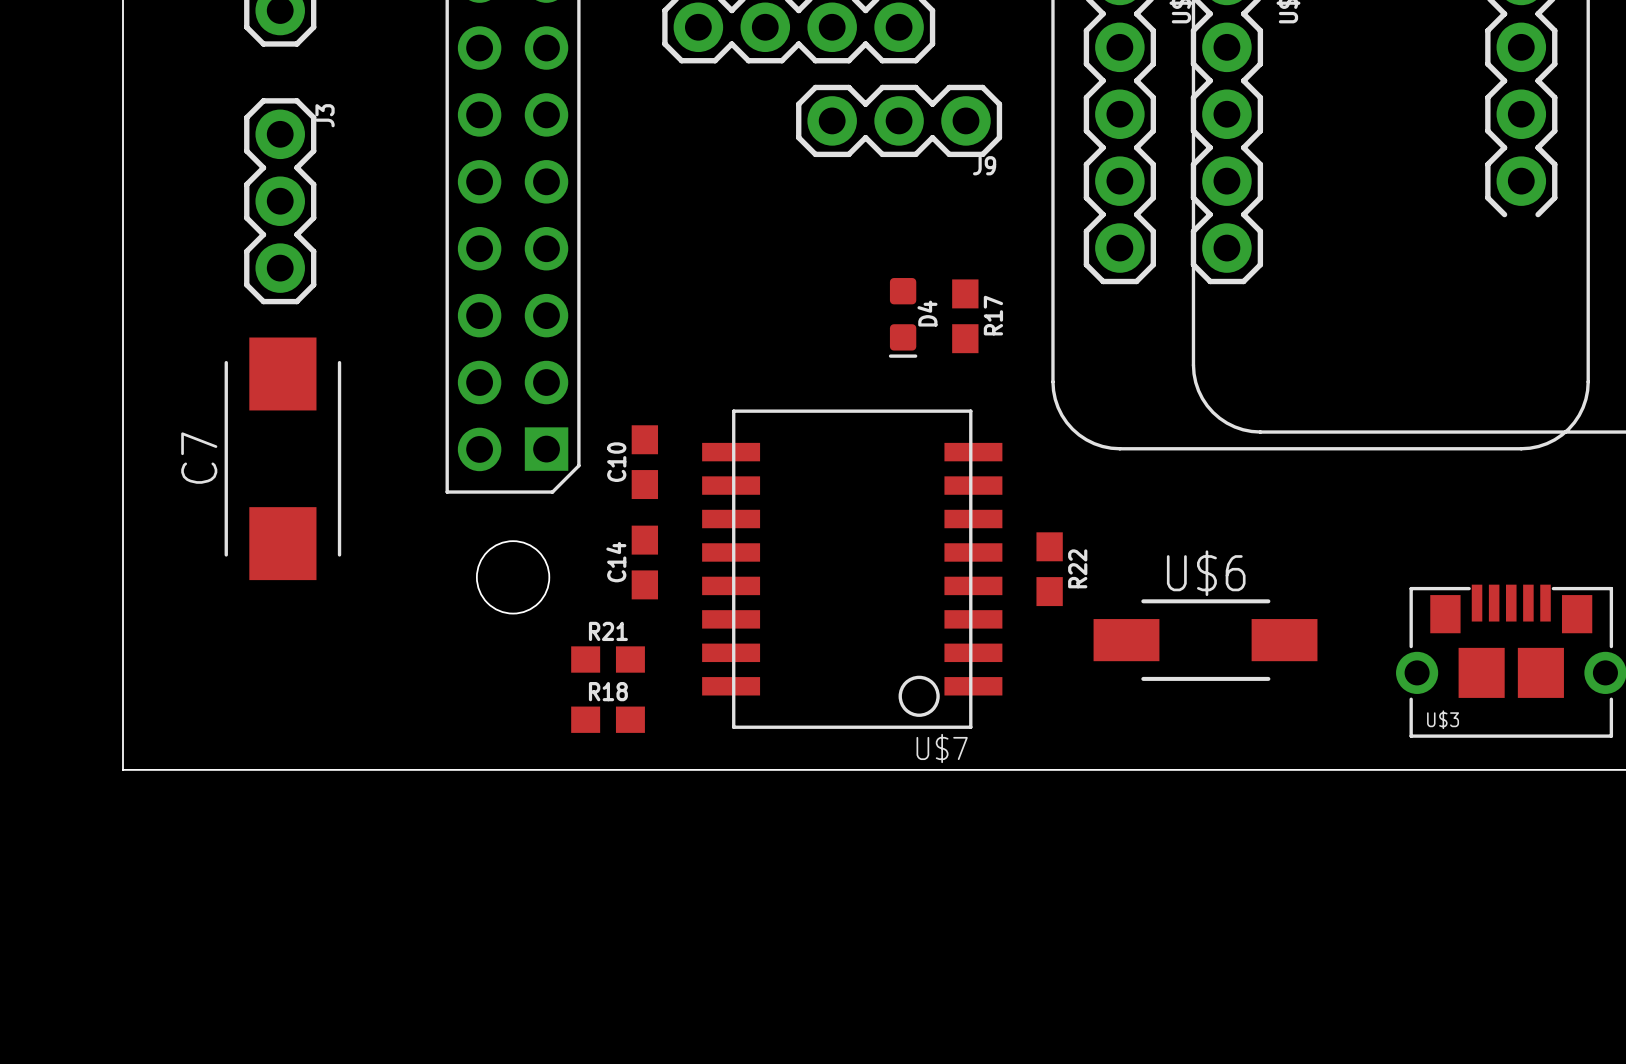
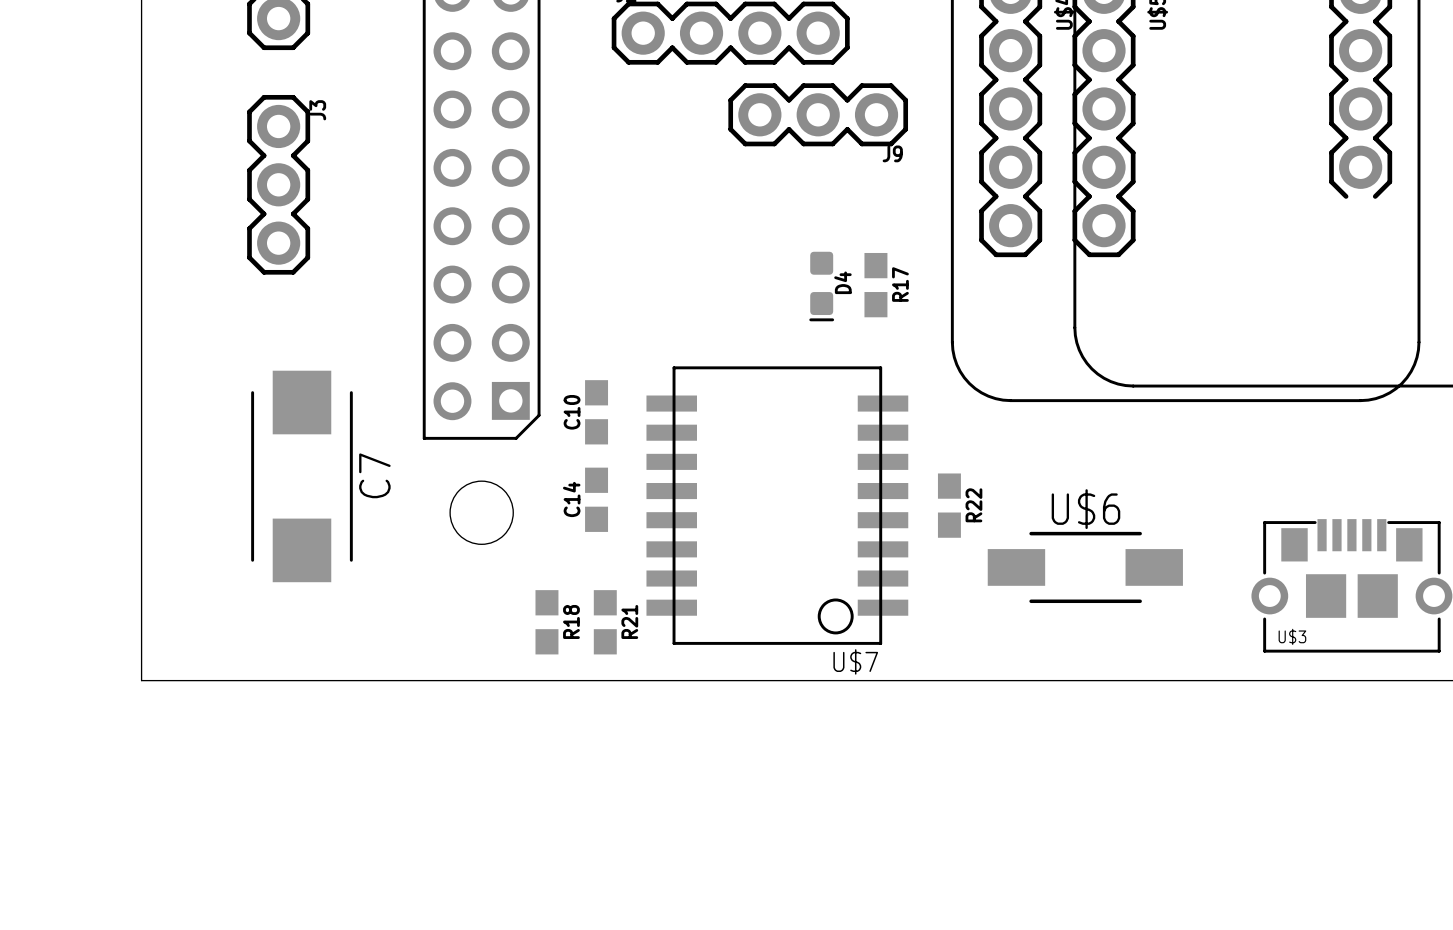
C7 name position: C7 (199, 458) -> C7 (374, 475)
C7 position: (282, 458) -> (301, 476)
R21 rotation: 0° (608, 659) -> 90° clockwise (605, 622)
R21 position: (608, 659) -> (605, 622)
R18 rotation: 0° (608, 719) -> 90° clockwise (546, 622)

